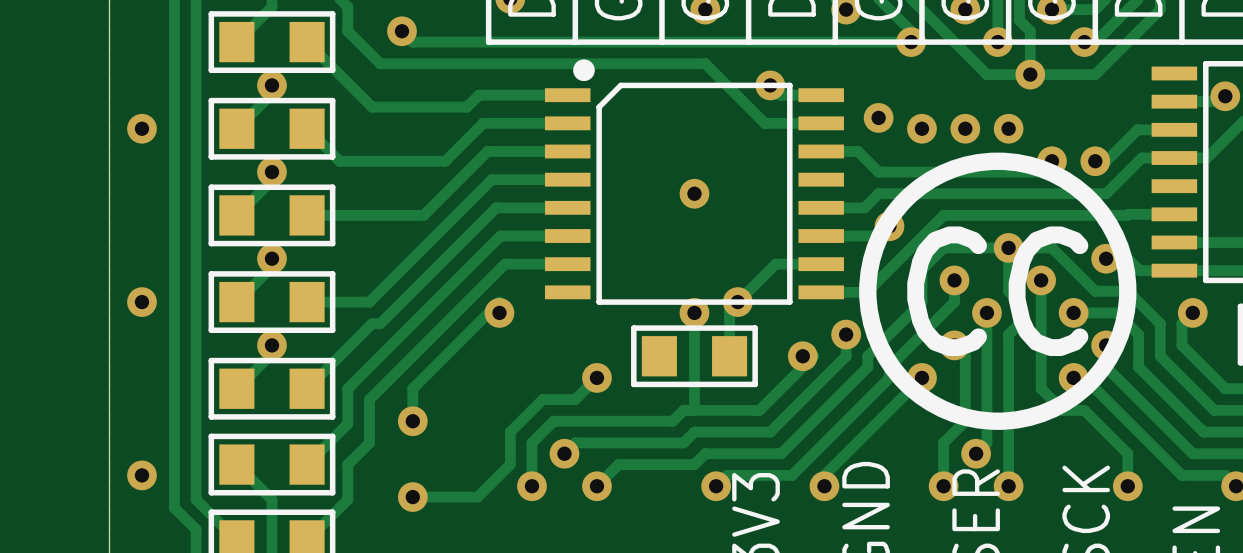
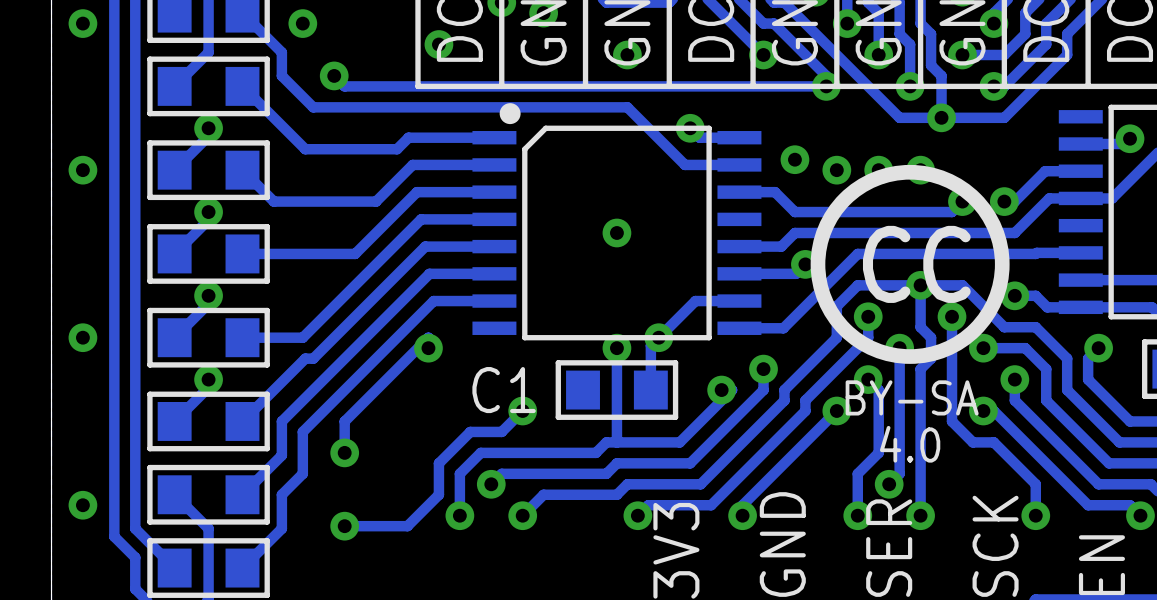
drawing: none -> [810, 164, 1010, 364]
drawing: [859, 152, 1137, 430] -> none
text: none -> CC (916, 264)
C1 name: none -> C1 (504, 390)
text: none -> BY-SA (912, 397)
text: none -> 4.0 (910, 444)

